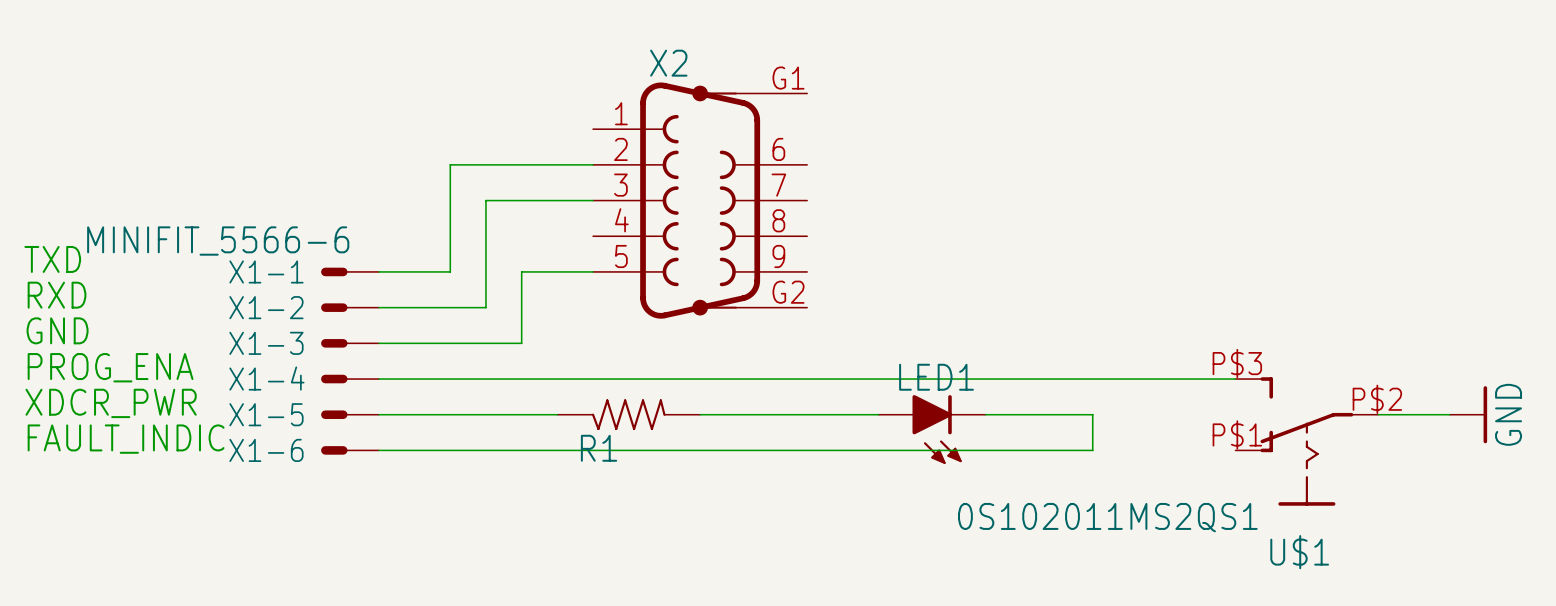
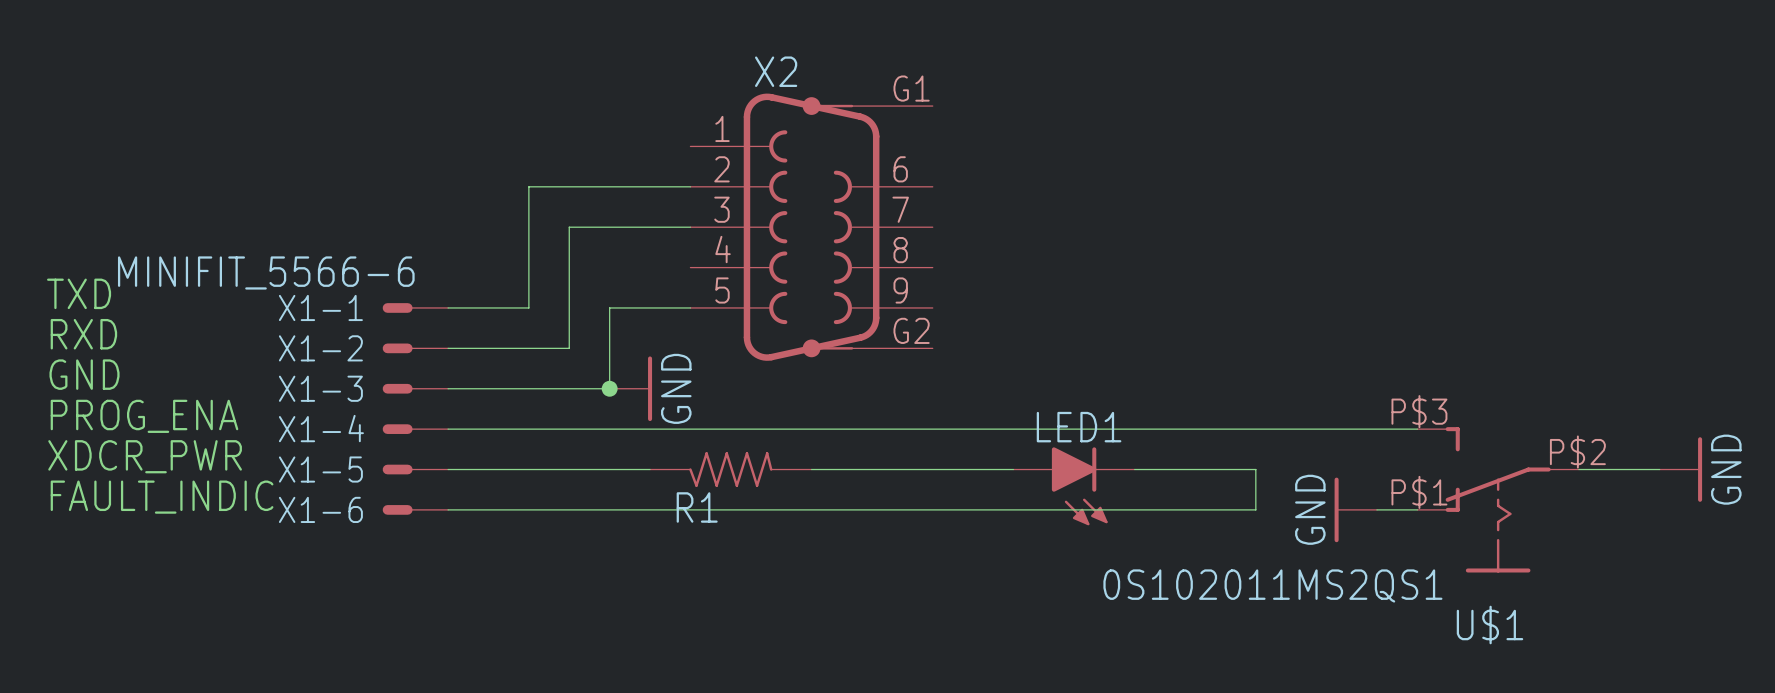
junction: none -> (609, 388)
power symbol: none -> GND (630, 388)
power symbol: none -> GND (1355, 509)
wire: none -> (1376, 509) (1417, 509)

